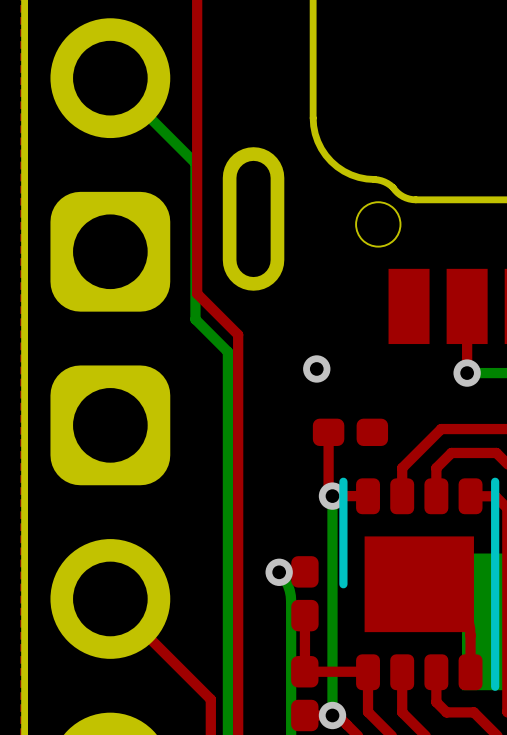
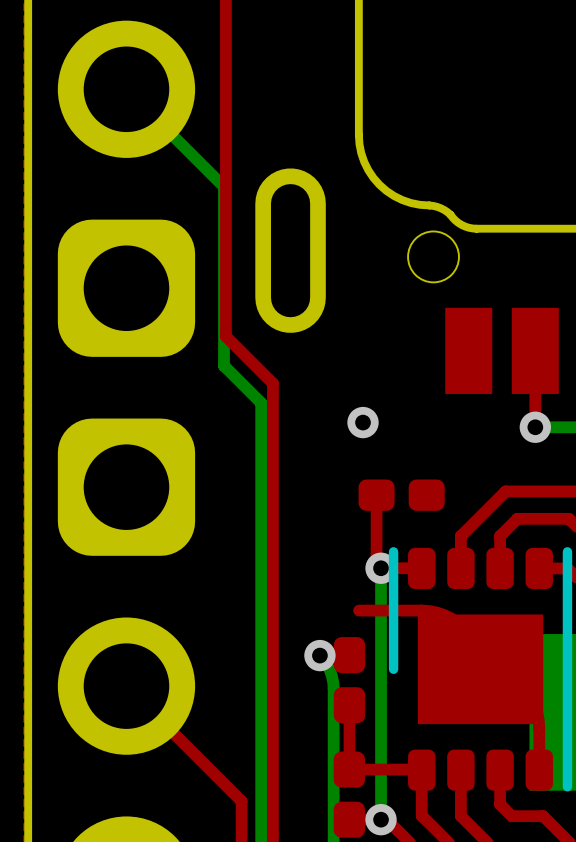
top track: none -> (359, 610) (421, 610) (444, 615) (457, 622) (472, 639) (478, 654) (480, 669)

